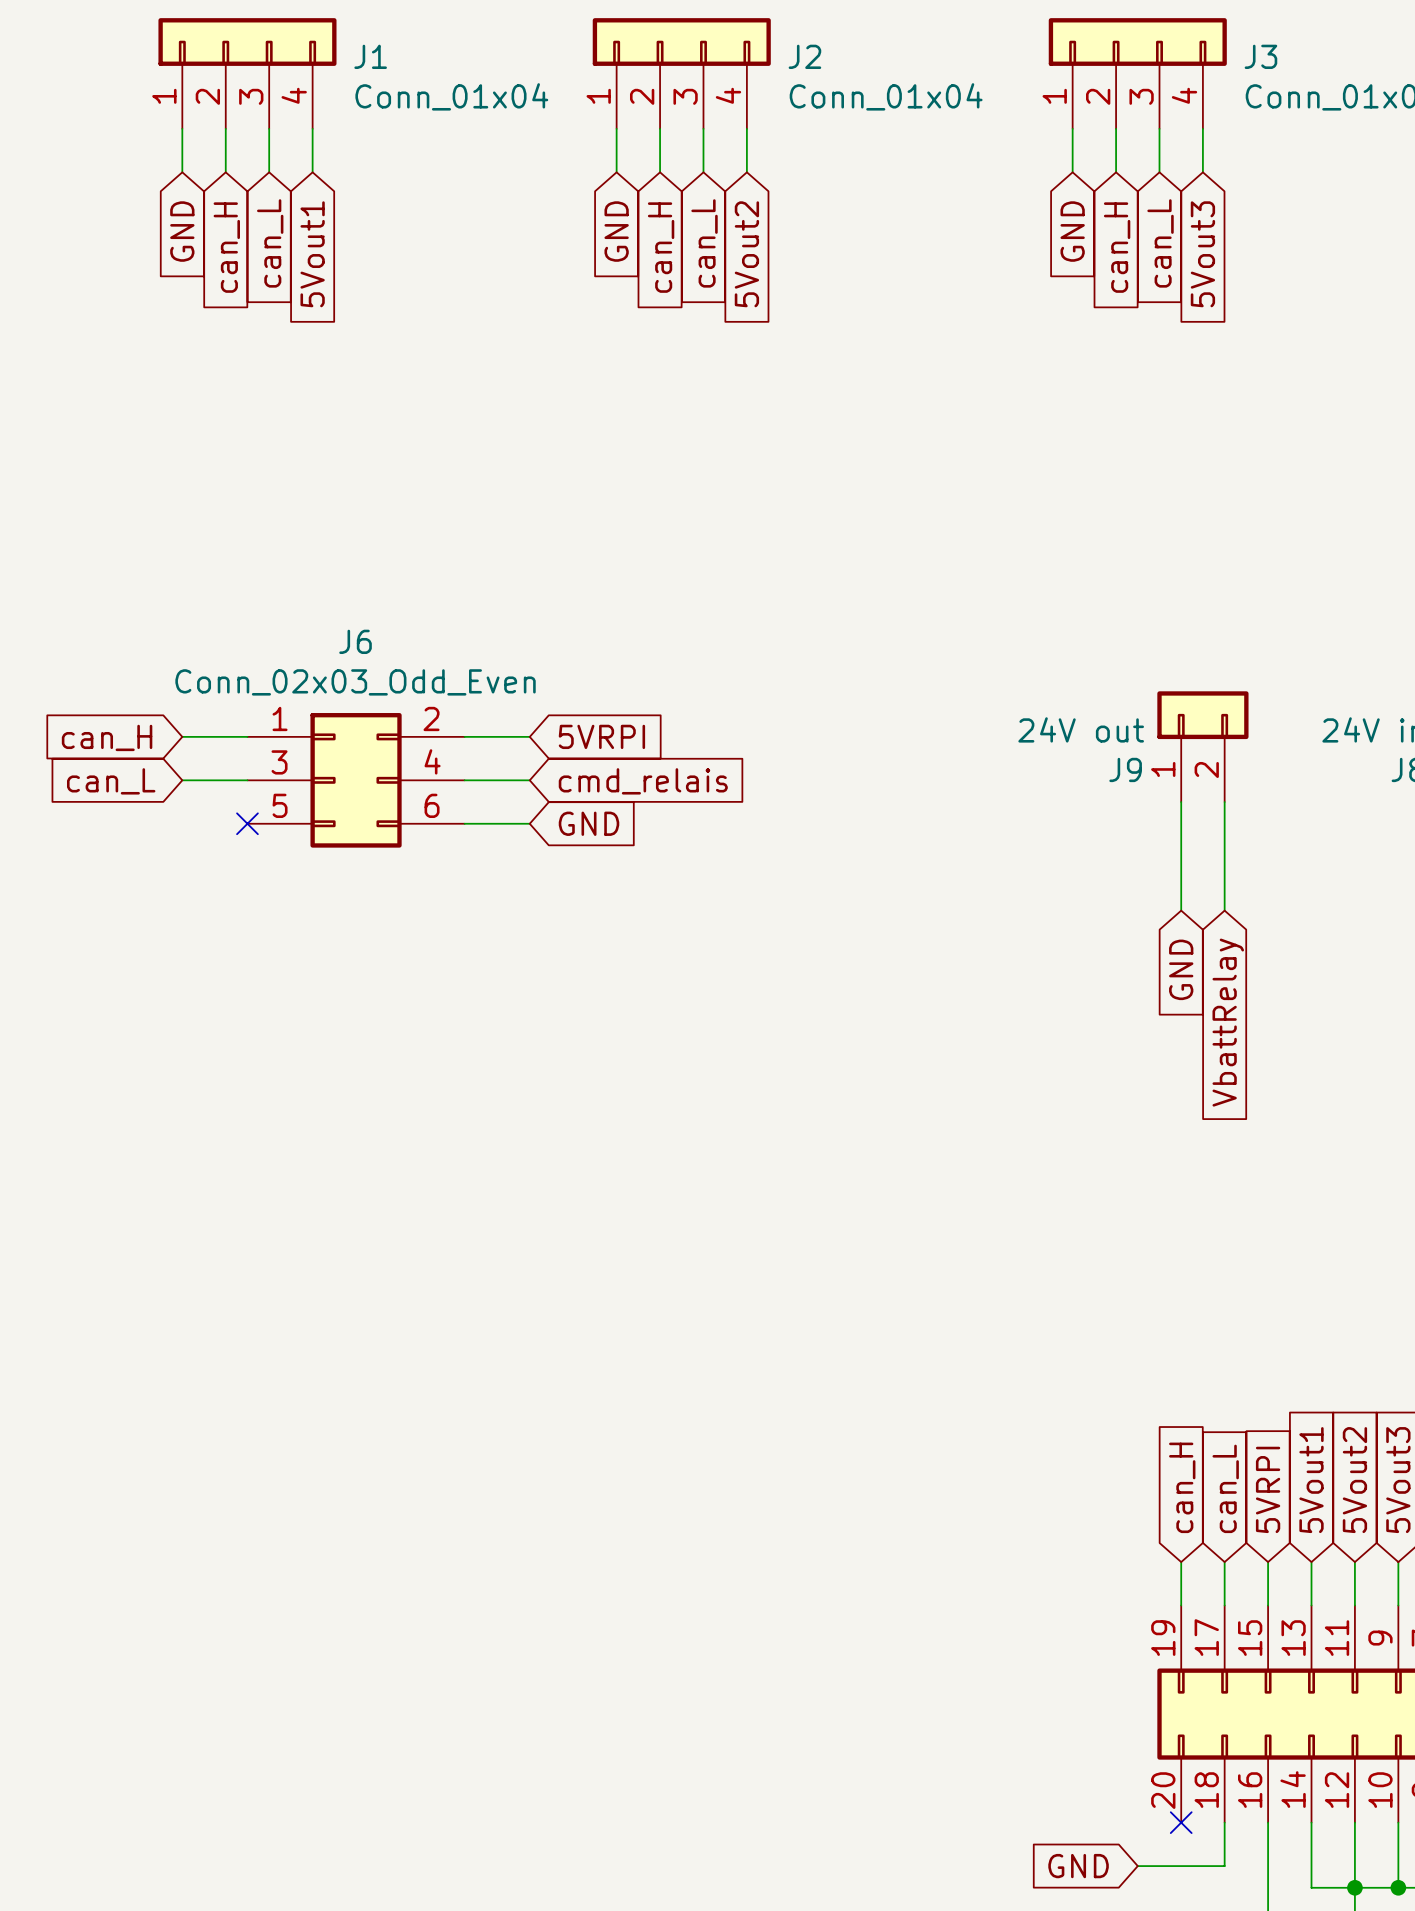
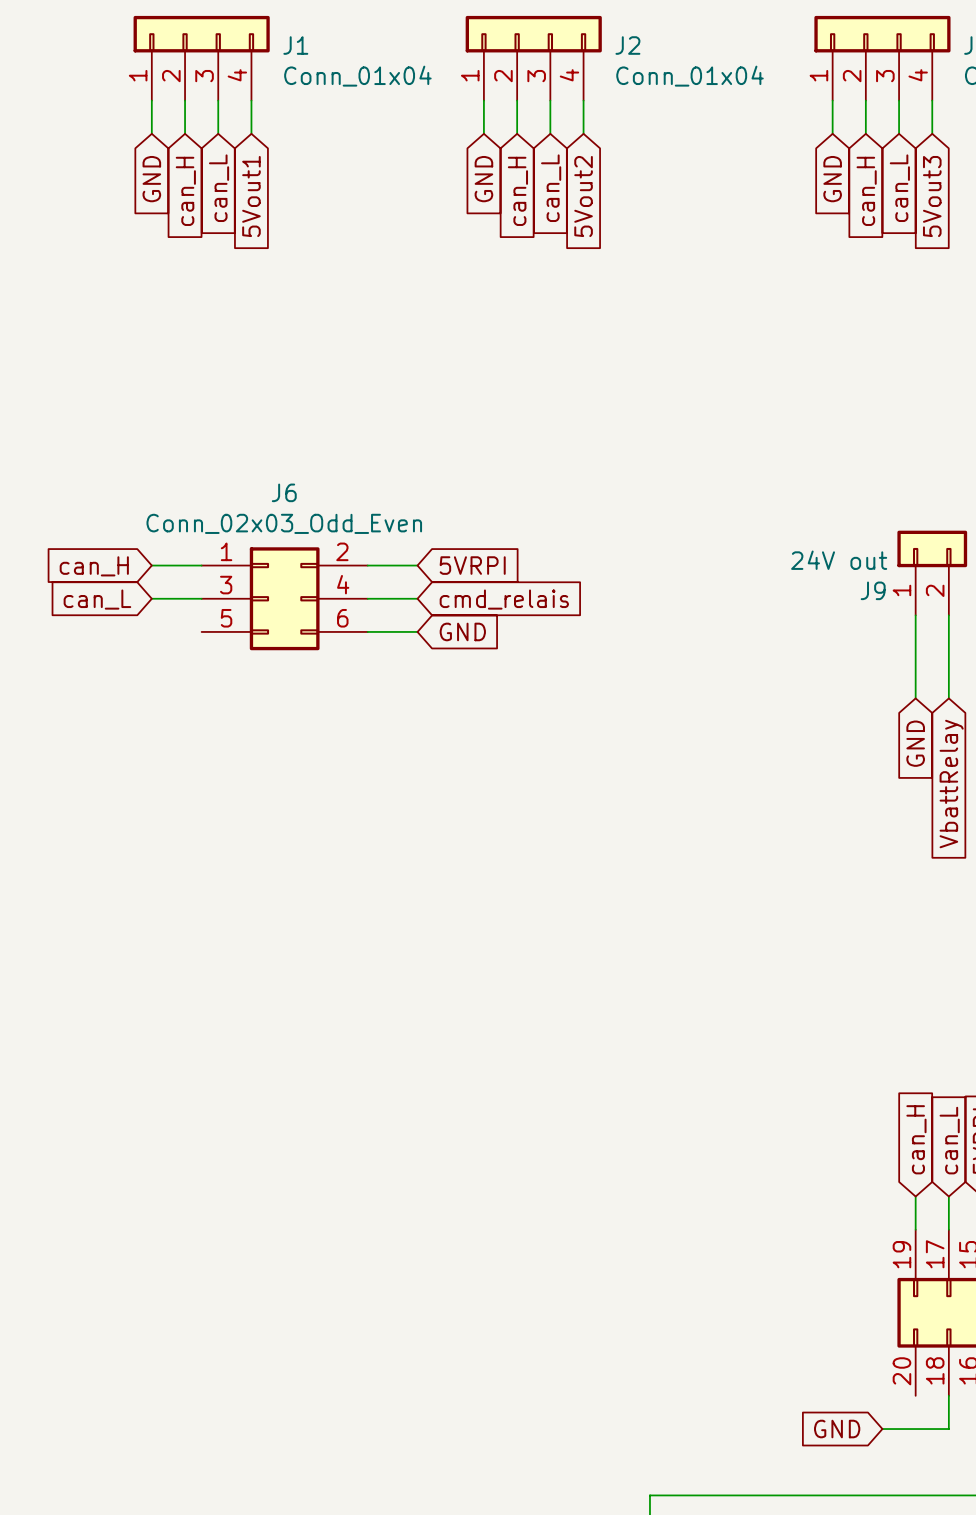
no-connect mark: (247, 823) -> none
no-connect mark: (1181, 1822) -> none

